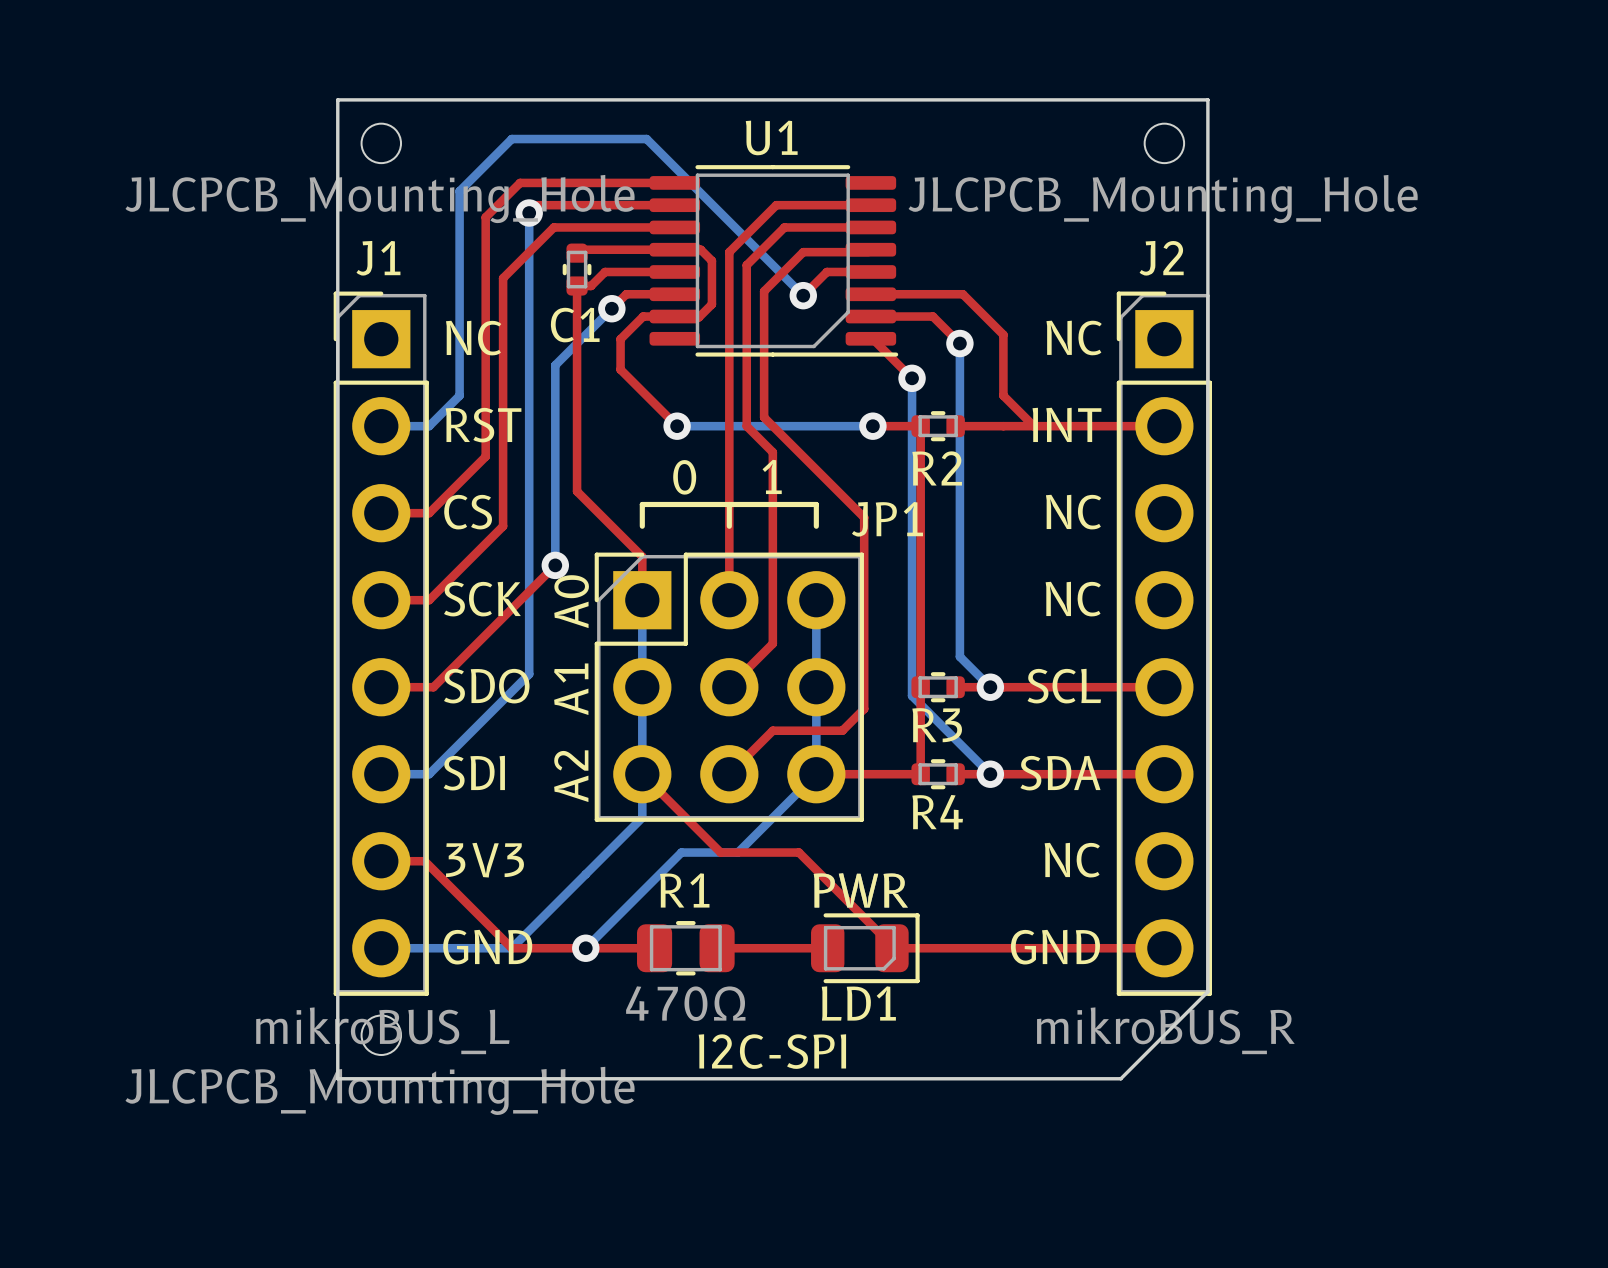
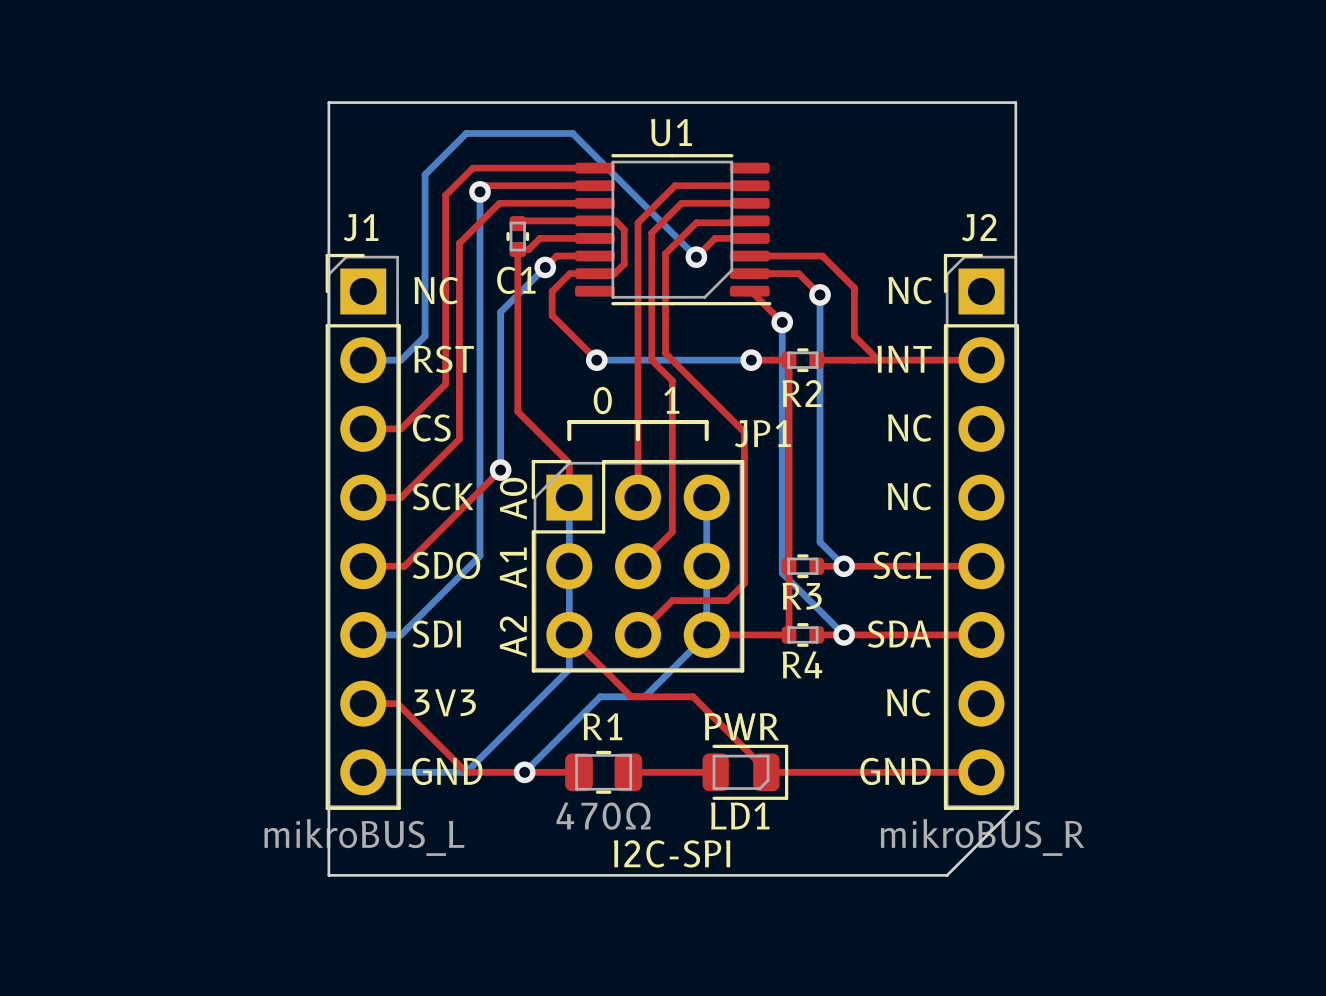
part: JLCPCB_Mounting_Hole (381, 143) -> none
part: JLCPCB_Mounting_Hole (1164, 143) -> none
part: JLCPCB_Mounting_Hole (381, 1035) -> none

